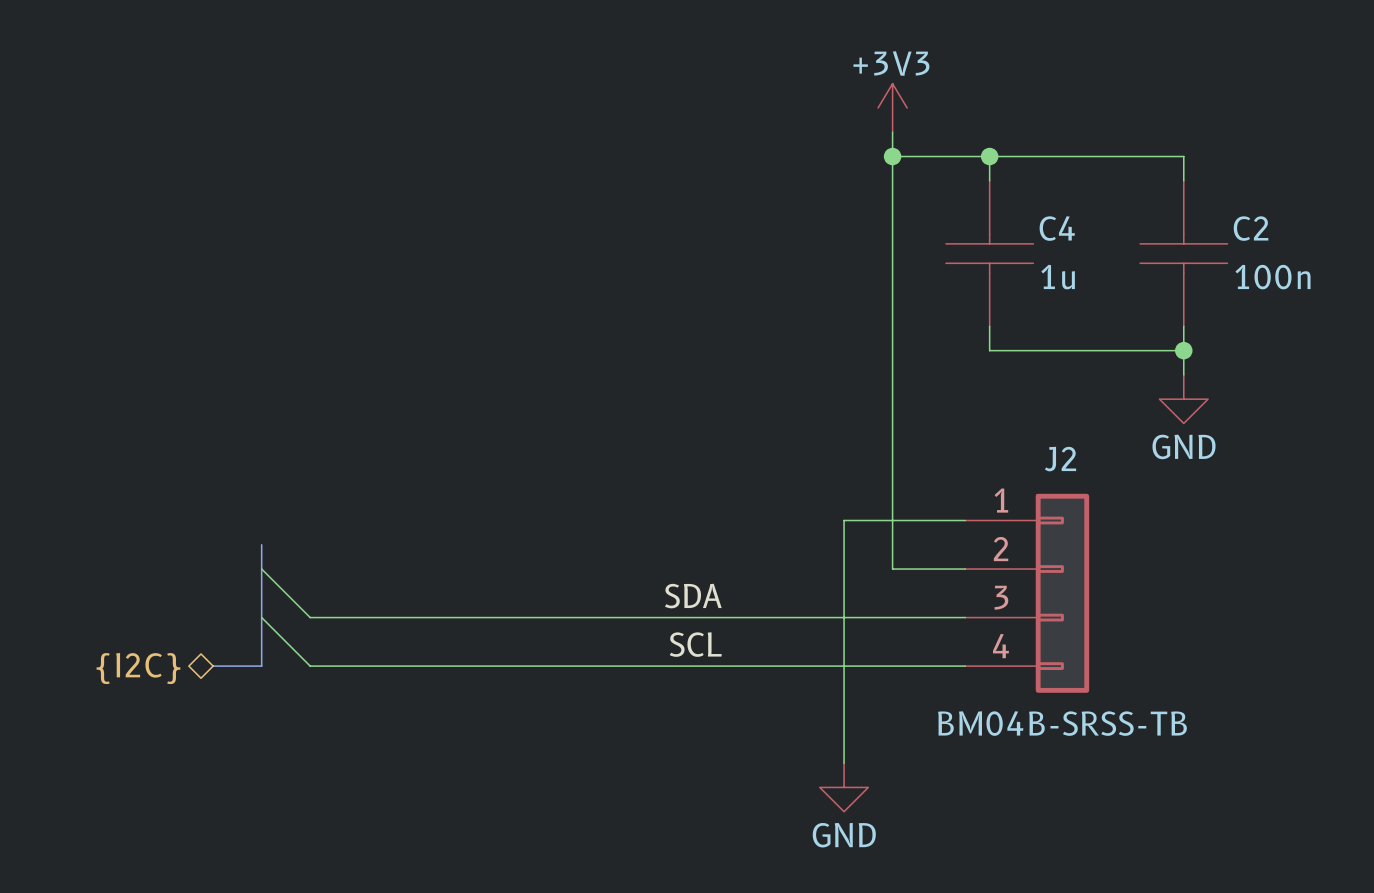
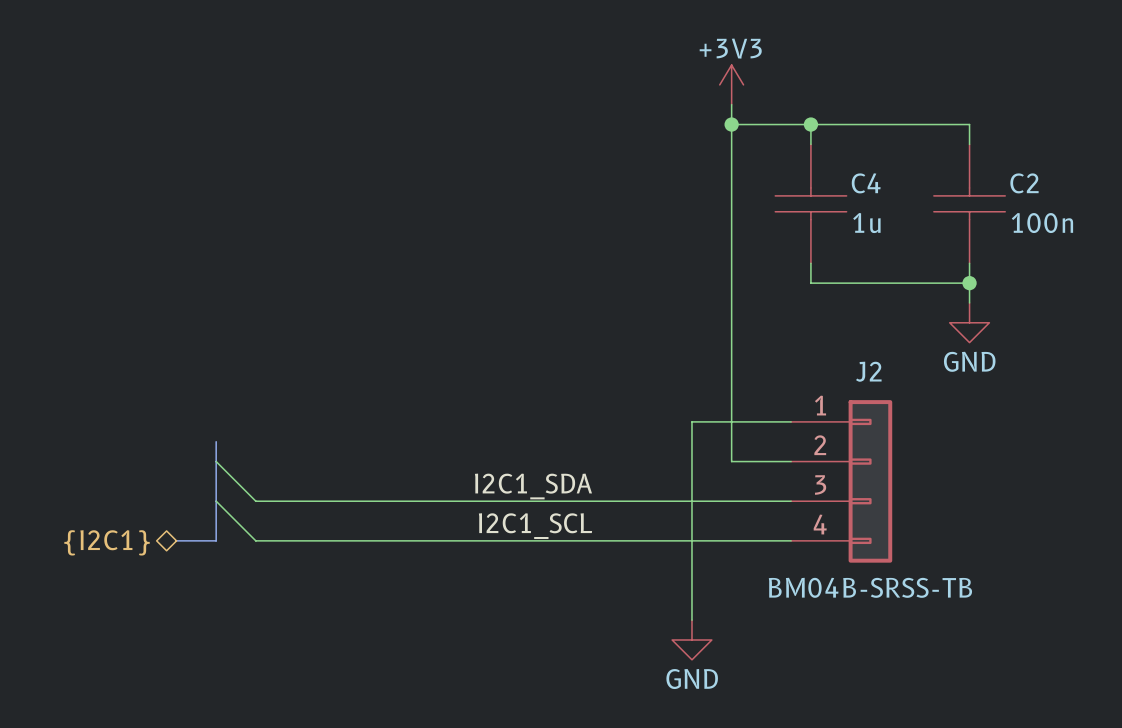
label: SDA (693, 596) -> I2C1_SDA (533, 486)
label: SCL (695, 644) -> I2C1_SCL (535, 526)
hierarchical label: {I2C} (138, 668) -> {I2C1} (107, 542)

